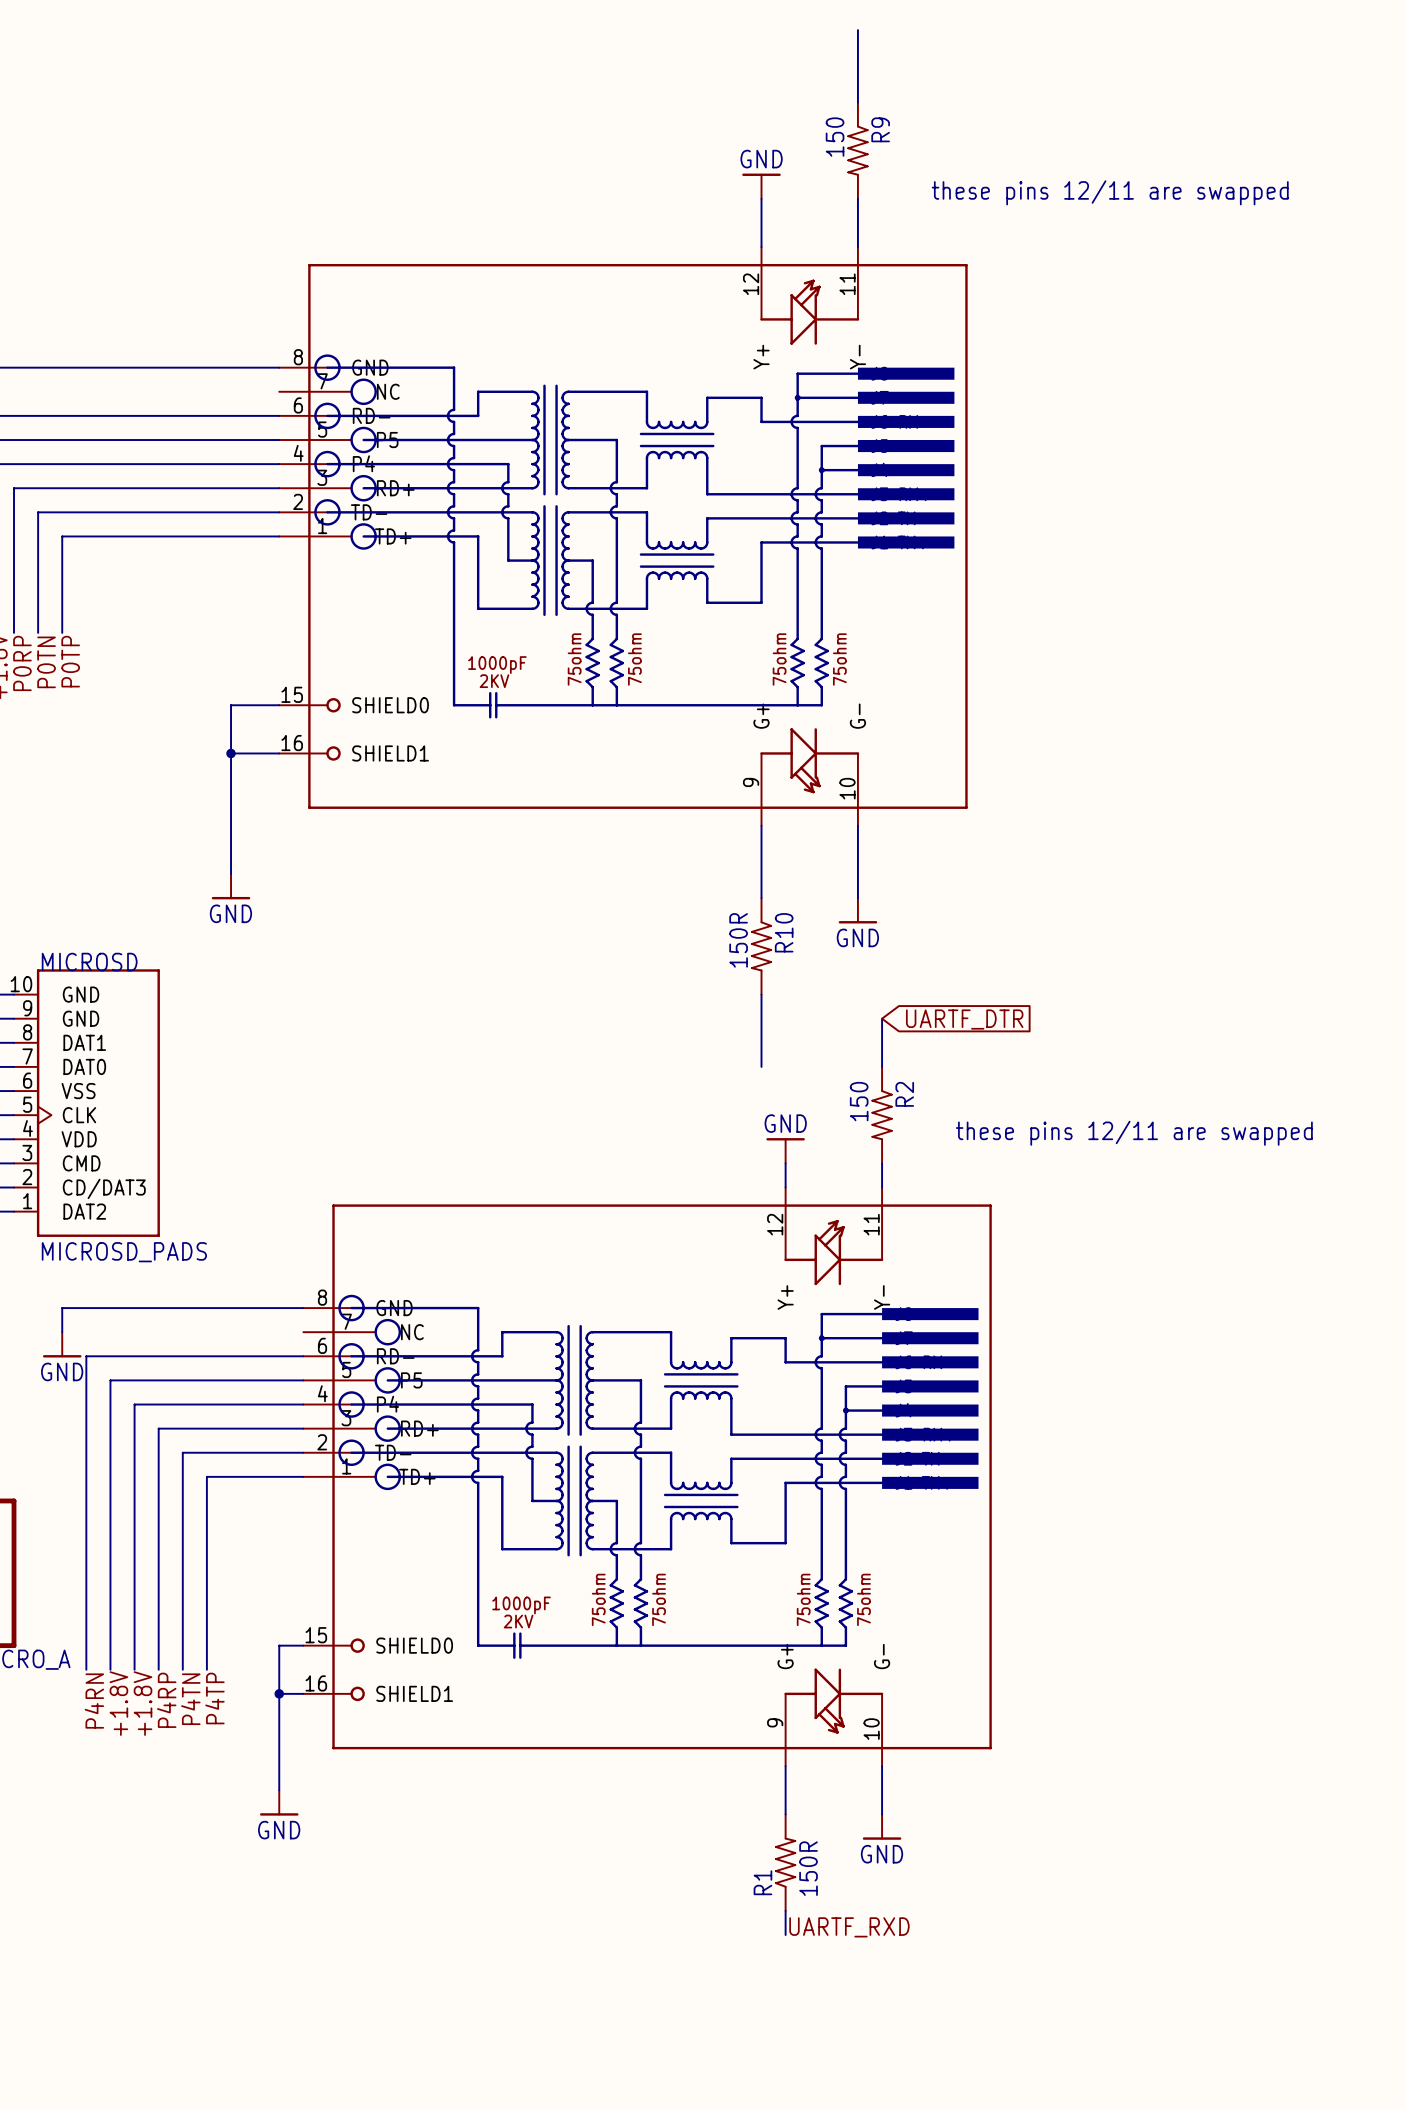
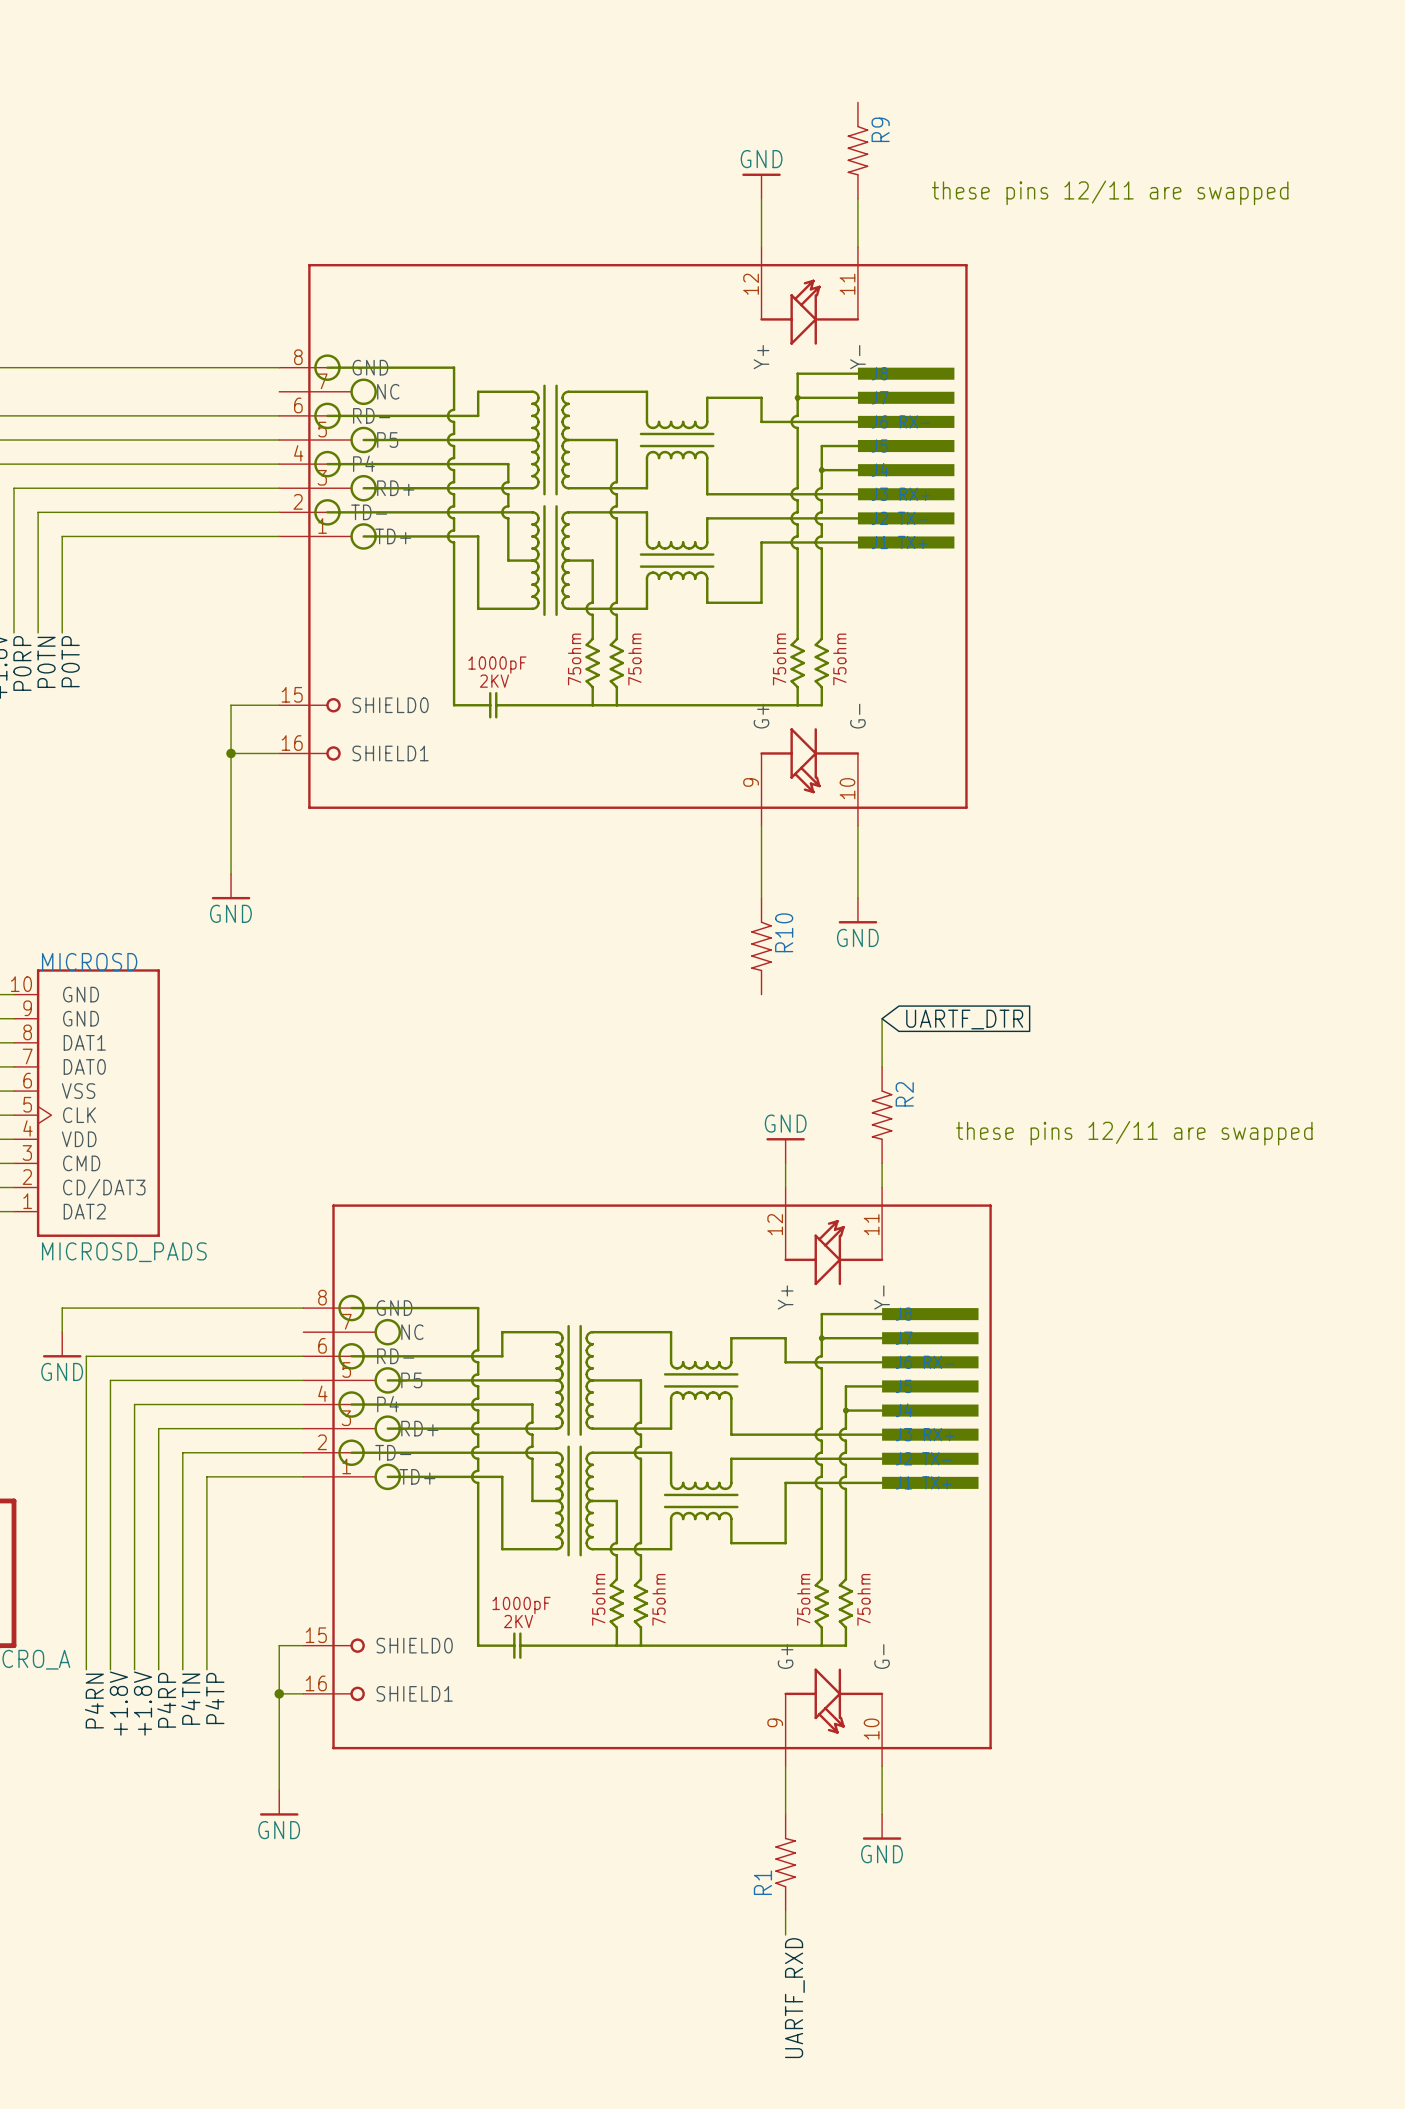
wire: (857, 30) (857, 102) -> none
R9 value: 150 (835, 137) -> none
R10 value: 150R (738, 940) -> none
wire: (761, 994) (761, 1066) -> none
R2 value: 150 (859, 1101) -> none
R1 value: 150R (808, 1868) -> none
label rotation: 0° (849, 1927) -> 90° counterclockwise (794, 1998)

